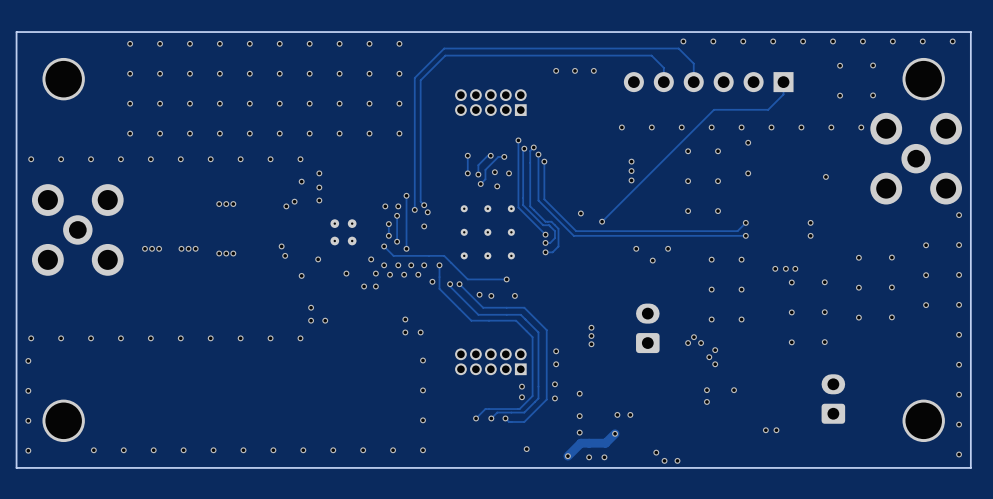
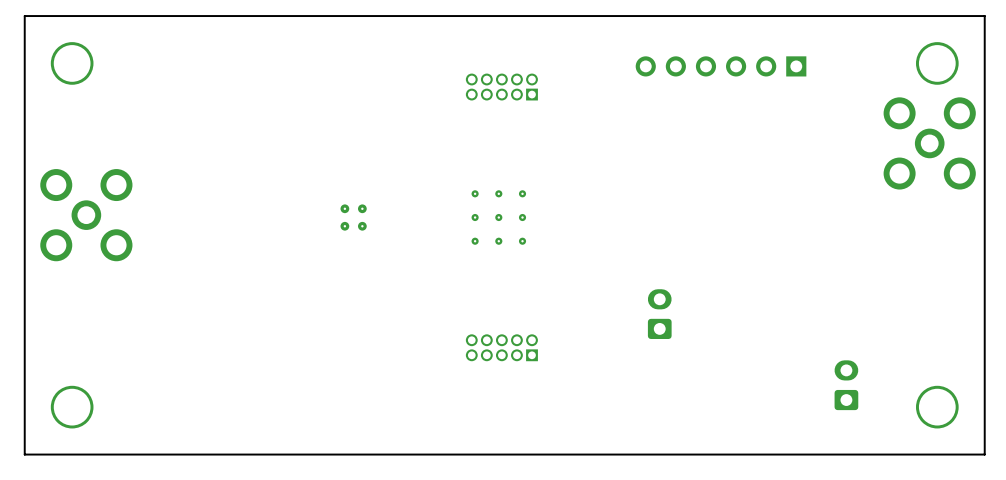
via: (683, 41) -> none
via: (713, 41) -> none
via: (743, 41) -> none
via: (773, 41) -> none
via: (803, 41) -> none
via: (833, 41) -> none
via: (862, 41) -> none
via: (892, 41) -> none
via: (922, 41) -> none
via: (952, 41) -> none
via: (130, 43) -> none
via: (160, 43) -> none
via: (189, 43) -> none
via: (219, 43) -> none
via: (249, 43) -> none
via: (279, 43) -> none
via: (309, 43) -> none
via: (339, 43) -> none
via: (369, 43) -> none
via: (399, 43) -> none
via: (840, 65) -> none
via: (873, 65) -> none
via: (556, 70) -> none
via: (574, 70) -> none
via: (593, 70) -> none
via: (130, 73) -> none
via: (160, 73) -> none
via: (189, 73) -> none
via: (219, 73) -> none
via: (249, 73) -> none
via: (279, 73) -> none
via: (309, 73) -> none
via: (339, 73) -> none
via: (369, 73) -> none
via: (399, 73) -> none
track: (663, 82) (663, 67) (651, 55) (445, 55) (420, 80) (420, 201) (424, 205) -> none
track: (693, 82) (693, 63) (678, 48) (444, 48) (414, 77) (414, 209) -> none
track: (783, 82) (783, 94) (768, 109) (714, 109) (602, 221) -> none
via: (840, 95) -> none
via: (873, 95) -> none
via: (130, 103) -> none
via: (160, 103) -> none
via: (189, 103) -> none
via: (219, 103) -> none
via: (249, 103) -> none
via: (279, 103) -> none
via: (309, 103) -> none
via: (339, 103) -> none
via: (369, 103) -> none
via: (399, 103) -> none
via: (621, 127) -> none
via: (651, 127) -> none
via: (681, 127) -> none
via: (711, 127) -> none
via: (741, 127) -> none
via: (771, 127) -> none
via: (801, 127) -> none
via: (831, 127) -> none
via: (861, 127) -> none
via: (130, 133) -> none
via: (160, 133) -> none
via: (189, 133) -> none
via: (219, 133) -> none
via: (249, 133) -> none
via: (279, 133) -> none
via: (309, 133) -> none
via: (339, 133) -> none
via: (369, 133) -> none
via: (399, 133) -> none
track: (518, 140) (518, 207) (545, 234) -> none
via: (518, 140) -> none
via: (748, 142) -> none
track: (533, 147) (530, 151) (530, 206) (545, 221) (551, 221) (558, 228) (558, 246) (552, 252) (545, 252) -> none
via: (533, 147) -> none
track: (524, 148) (523, 205) (543, 225) (549, 225) (554, 231) (554, 238) (550, 242) (545, 242) -> none
via: (524, 148) -> none
via: (688, 151) -> none
via: (718, 151) -> none
track: (538, 154) (538, 200) (573, 235) (745, 235) -> none
via: (538, 154) -> none
track: (467, 155) (467, 173) -> none
via: (467, 155) -> none
track: (490, 155) (487, 155) (478, 165) (478, 174) -> none
via: (490, 155) -> none
track: (504, 156) (498, 156) (485, 169) (485, 179) (480, 184) -> none
via: (504, 156) -> none
via: (31, 159) -> none
via: (61, 159) -> none
via: (91, 159) -> none
via: (120, 159) -> none
via: (150, 159) -> none
via: (180, 159) -> none
via: (210, 159) -> none
via: (240, 159) -> none
via: (270, 159) -> none
via: (300, 159) -> none
track: (544, 161) (544, 199) (576, 231) (737, 231) (745, 222) -> none
via: (544, 161) -> none
via: (631, 161) -> none
via: (631, 171) -> none
via: (494, 172) -> none
via: (319, 173) -> none
via: (467, 173) -> none
via: (509, 173) -> none
via: (748, 173) -> none
via: (478, 174) -> none
via: (825, 176) -> none
via: (631, 180) -> none
via: (301, 181) -> none
via: (688, 181) -> none
via: (718, 181) -> none
via: (480, 184) -> none
via: (497, 186) -> none
via: (319, 187) -> none
track: (406, 195) (406, 248) -> none
via: (406, 195) -> none
via: (319, 200) -> none
via: (294, 201) -> none
via: (219, 204) -> none
via: (226, 204) -> none
via: (233, 204) -> none
via: (424, 205) -> none
via: (286, 206) -> none
via: (385, 206) -> none
via: (398, 206) -> none
via: (414, 209) -> none
via: (688, 211) -> none
via: (718, 211) -> none
via: (427, 212) -> none
via: (580, 213) -> none
track: (397, 215) (397, 241) -> none
via: (397, 215) -> none
via: (959, 215) -> none
via: (602, 221) -> none
via: (745, 222) -> none
via: (810, 222) -> none
track: (388, 224) (388, 235) -> none
via: (388, 224) -> none
via: (424, 226) -> none
via: (545, 234) -> none
via: (388, 235) -> none
via: (745, 235) -> none
via: (810, 235) -> none
via: (397, 241) -> none
via: (545, 242) -> none
via: (926, 245) -> none
via: (959, 245) -> none
via: (281, 246) -> none
track: (384, 246) (393, 255) (444, 255) (467, 279) (506, 279) -> none
via: (384, 246) -> none
via: (144, 248) -> none
via: (152, 248) -> none
via: (159, 248) -> none
via: (181, 248) -> none
via: (188, 248) -> none
via: (195, 248) -> none
via: (406, 248) -> none
via: (636, 248) -> none
via: (668, 248) -> none
via: (545, 252) -> none
via: (219, 253) -> none
via: (226, 253) -> none
via: (233, 253) -> none
via: (285, 255) -> none
via: (858, 257) -> none
via: (891, 257) -> none
via: (318, 259) -> none
via: (371, 259) -> none
via: (711, 259) -> none
via: (741, 259) -> none
via: (652, 260) -> none
via: (384, 265) -> none
via: (398, 265) -> none
via: (411, 265) -> none
via: (424, 265) -> none
track: (439, 265) (439, 288) (471, 320) (516, 320) (532, 337) (532, 396) (519, 409) (485, 409) (476, 418) -> none
via: (439, 265) -> none
via: (775, 268) -> none
via: (785, 268) -> none
via: (795, 268) -> none
via: (346, 273) -> none
via: (375, 273) -> none
via: (390, 274) -> none
via: (404, 274) -> none
via: (418, 274) -> none
via: (959, 274) -> none
via: (301, 275) -> none
via: (926, 275) -> none
via: (506, 279) -> none
via: (432, 281) -> none
via: (791, 282) -> none
via: (824, 282) -> none
track: (450, 284) (450, 286) (478, 314) (520, 314) (538, 332) (538, 398) (524, 412) (497, 412) (491, 418) -> none
via: (450, 284) -> none
track: (459, 284) (483, 307) (524, 307) (546, 330) (546, 399) (524, 421) (509, 421) (505, 418) -> none
via: (459, 284) -> none
via: (364, 286) -> none
via: (375, 286) -> none
via: (858, 287) -> none
via: (891, 287) -> none
via: (711, 289) -> none
via: (741, 289) -> none
via: (479, 294) -> none
via: (491, 295) -> none
via: (514, 295) -> none
via: (959, 304) -> none
via: (926, 305) -> none
via: (311, 307) -> none
via: (791, 312) -> none
via: (824, 312) -> none
via: (858, 317) -> none
via: (891, 317) -> none
via: (405, 319) -> none
via: (711, 319) -> none
via: (741, 319) -> none
via: (311, 320) -> none
via: (325, 320) -> none
via: (591, 327) -> none
via: (405, 332) -> none
via: (420, 332) -> none
via: (959, 334) -> none
via: (591, 335) -> none
via: (693, 337) -> none
via: (31, 338) -> none
via: (61, 338) -> none
via: (91, 338) -> none
via: (120, 338) -> none
via: (150, 338) -> none
via: (180, 338) -> none
via: (210, 338) -> none
via: (240, 338) -> none
via: (270, 338) -> none
via: (300, 338) -> none
via: (791, 342) -> none
via: (824, 342) -> none
via: (688, 343) -> none
via: (701, 343) -> none
via: (591, 344) -> none
via: (715, 350) -> none
via: (556, 351) -> none
via: (709, 357) -> none
via: (28, 360) -> none
via: (423, 360) -> none
via: (556, 364) -> none
via: (715, 364) -> none
via: (959, 364) -> none
via: (554, 384) -> none
via: (521, 386) -> none
via: (28, 390) -> none
via: (423, 390) -> none
via: (706, 390) -> none
via: (734, 390) -> none
via: (579, 393) -> none
via: (959, 394) -> none
via: (521, 397) -> none
via: (554, 398) -> none
via: (706, 401) -> none
via: (617, 414) -> none
via: (630, 414) -> none
via: (579, 416) -> none
via: (476, 418) -> none
via: (491, 418) -> none
via: (505, 418) -> none
via: (28, 420) -> none
via: (423, 420) -> none
via: (959, 424) -> none
via: (765, 430) -> none
via: (776, 430) -> none
via: (579, 432) -> none
track: (615, 433) (605, 443) (580, 443) (567, 456) -> none
via: (615, 433) -> none
via: (526, 449) -> none
via: (28, 450) -> none
via: (93, 450) -> none
via: (123, 450) -> none
via: (153, 450) -> none
via: (183, 450) -> none
via: (213, 450) -> none
via: (243, 450) -> none
via: (273, 450) -> none
via: (303, 450) -> none
via: (333, 450) -> none
via: (363, 450) -> none
via: (393, 450) -> none
via: (423, 450) -> none
via: (656, 452) -> none
via: (959, 454) -> none
via: (567, 456) -> none
via: (589, 457) -> none
via: (604, 457) -> none
via: (664, 460) -> none
via: (677, 460) -> none

